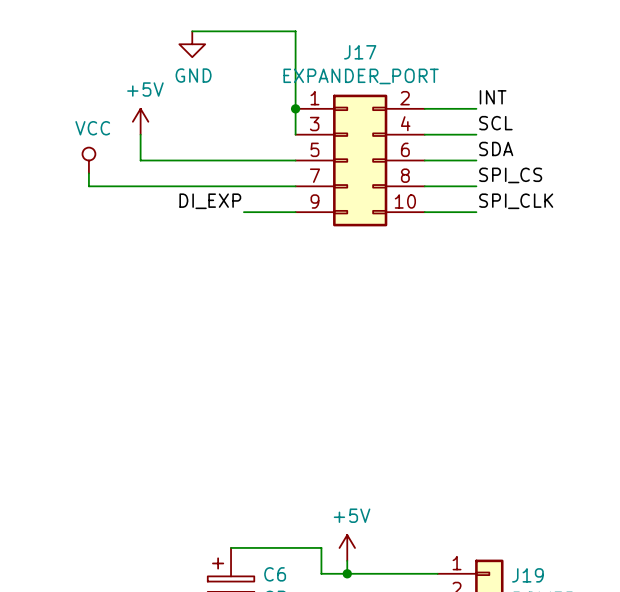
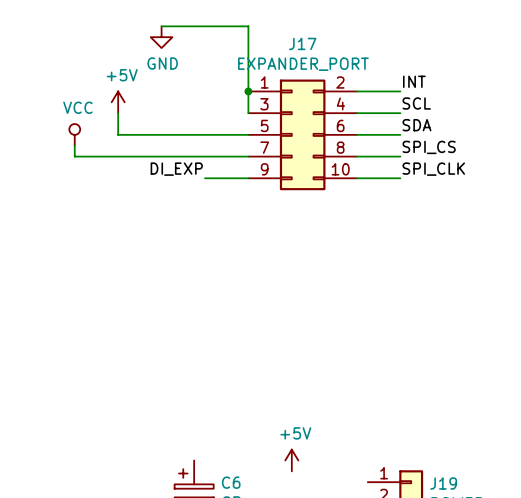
wire: (231, 547) (321, 547) (321, 573) (437, 573) -> none
wire: (347, 560) (347, 573) -> none
junction: (347, 573) -> none

